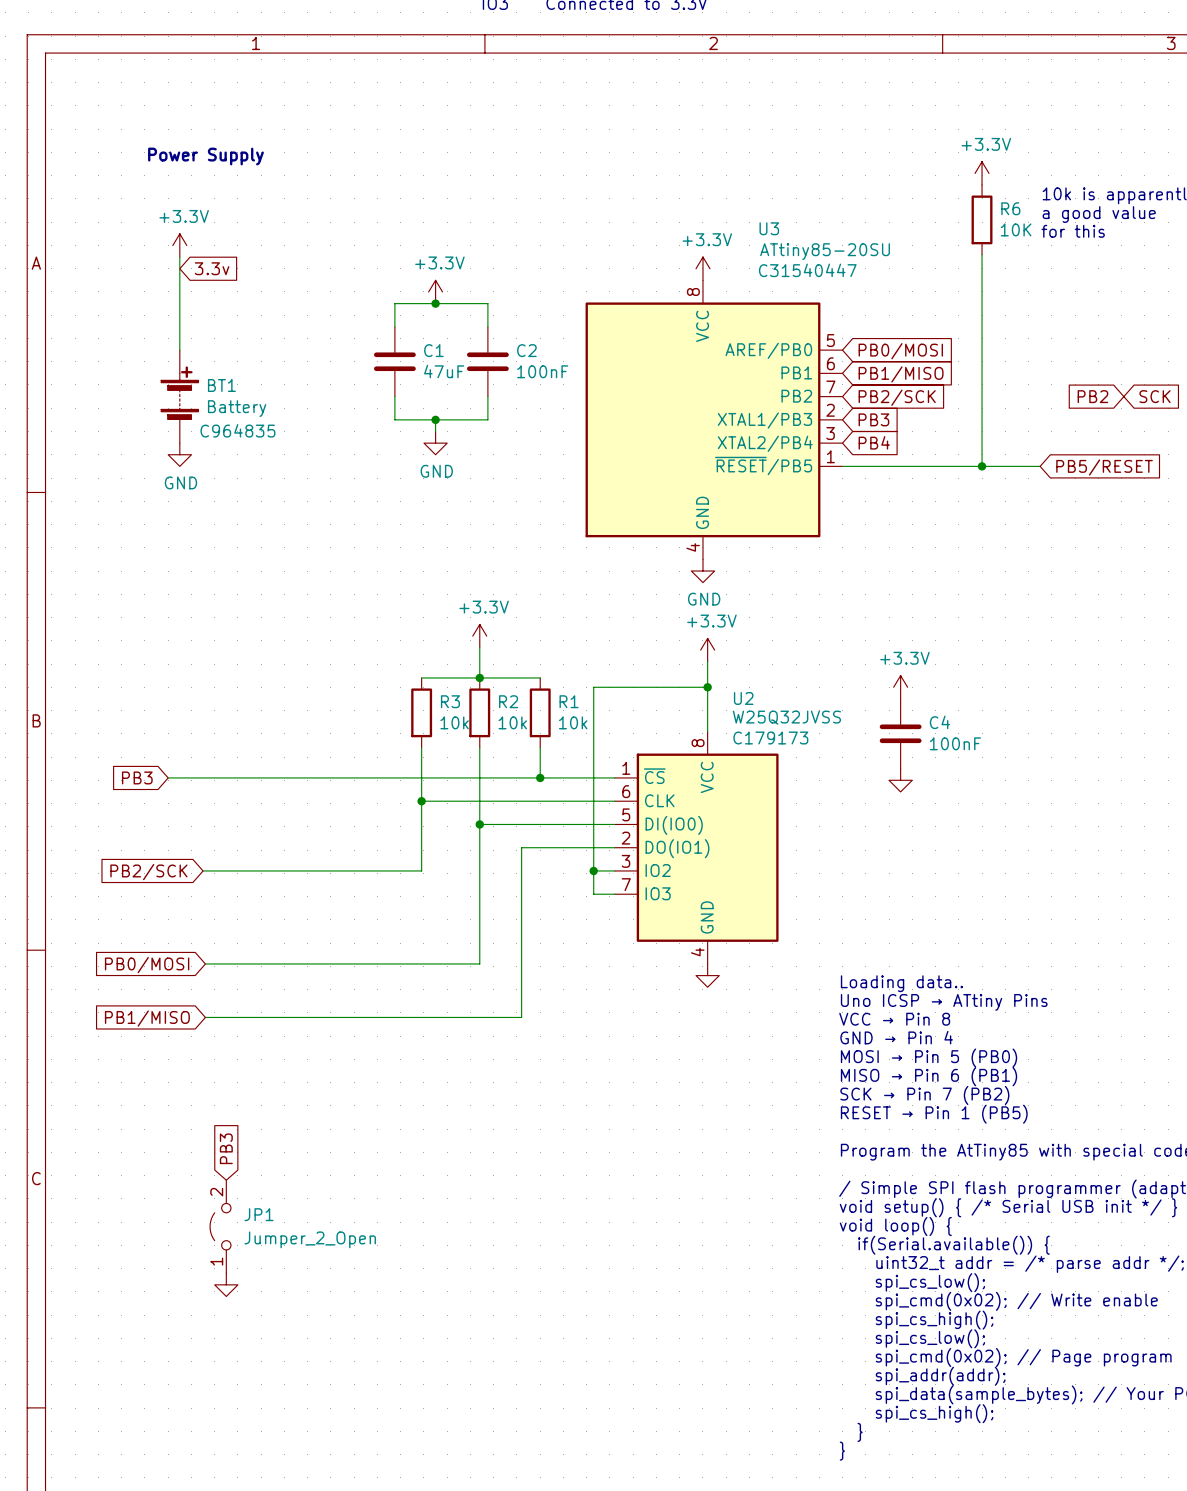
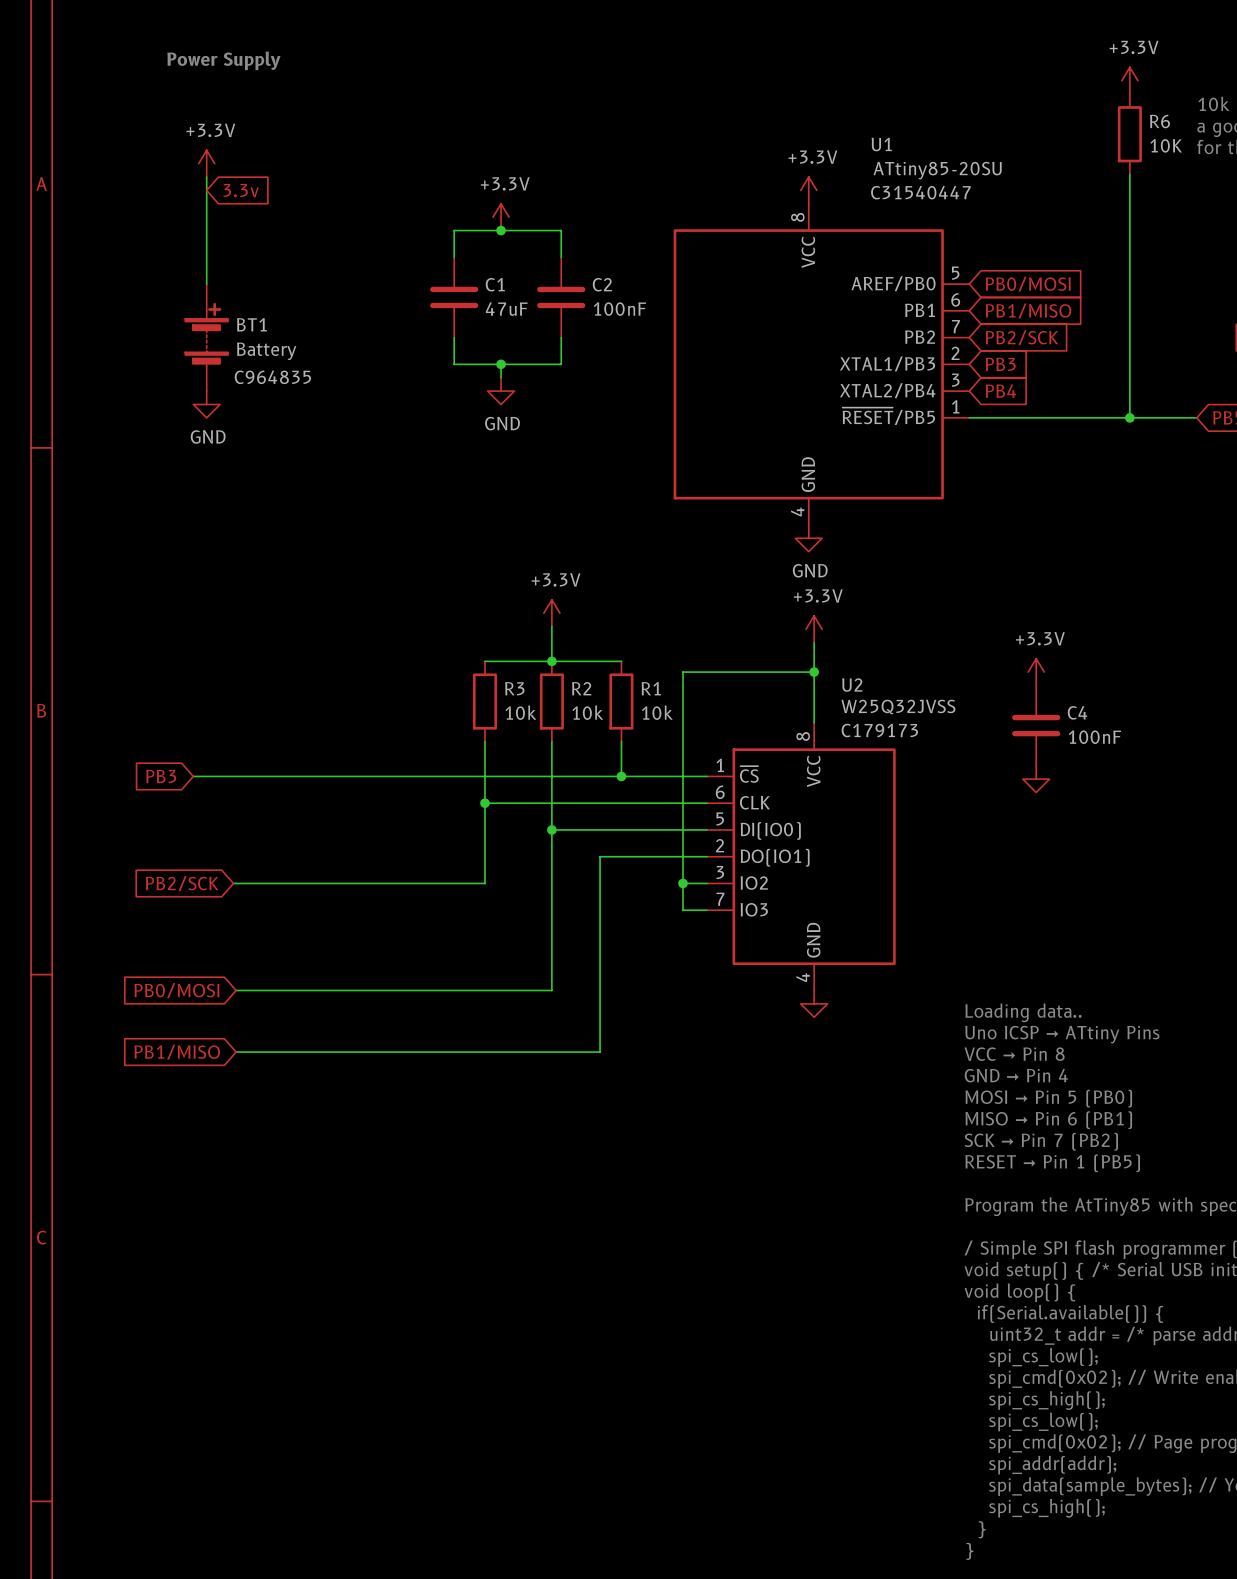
U3 name: U3 (769, 228) -> U1 (881, 144)
global label: PB3 (226, 1148) -> none
JP1: Jumper_2_Open (220, 1226) -> none
power symbol: (226, 1284) -> none

